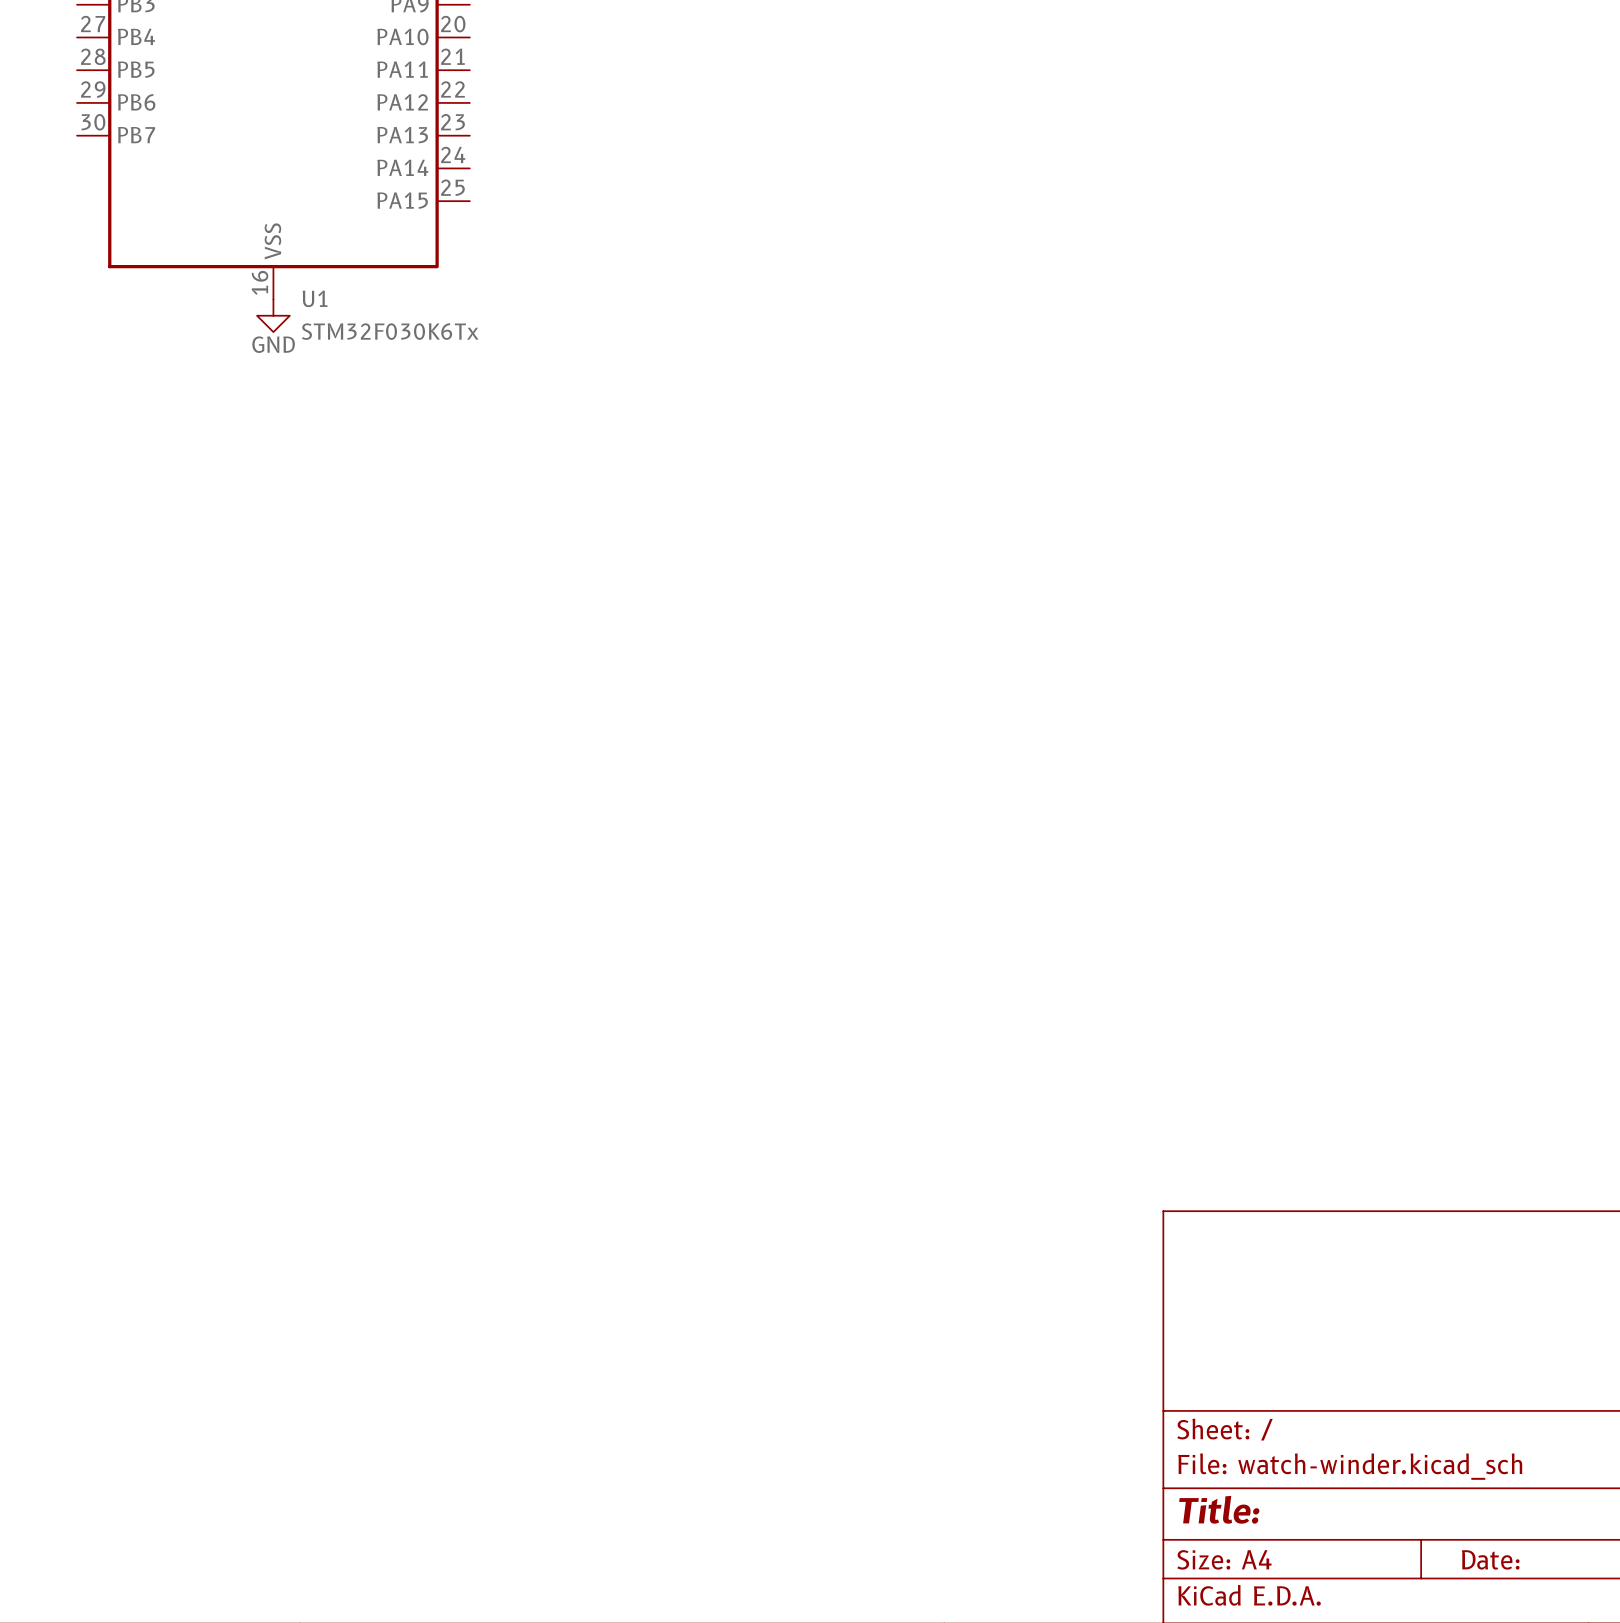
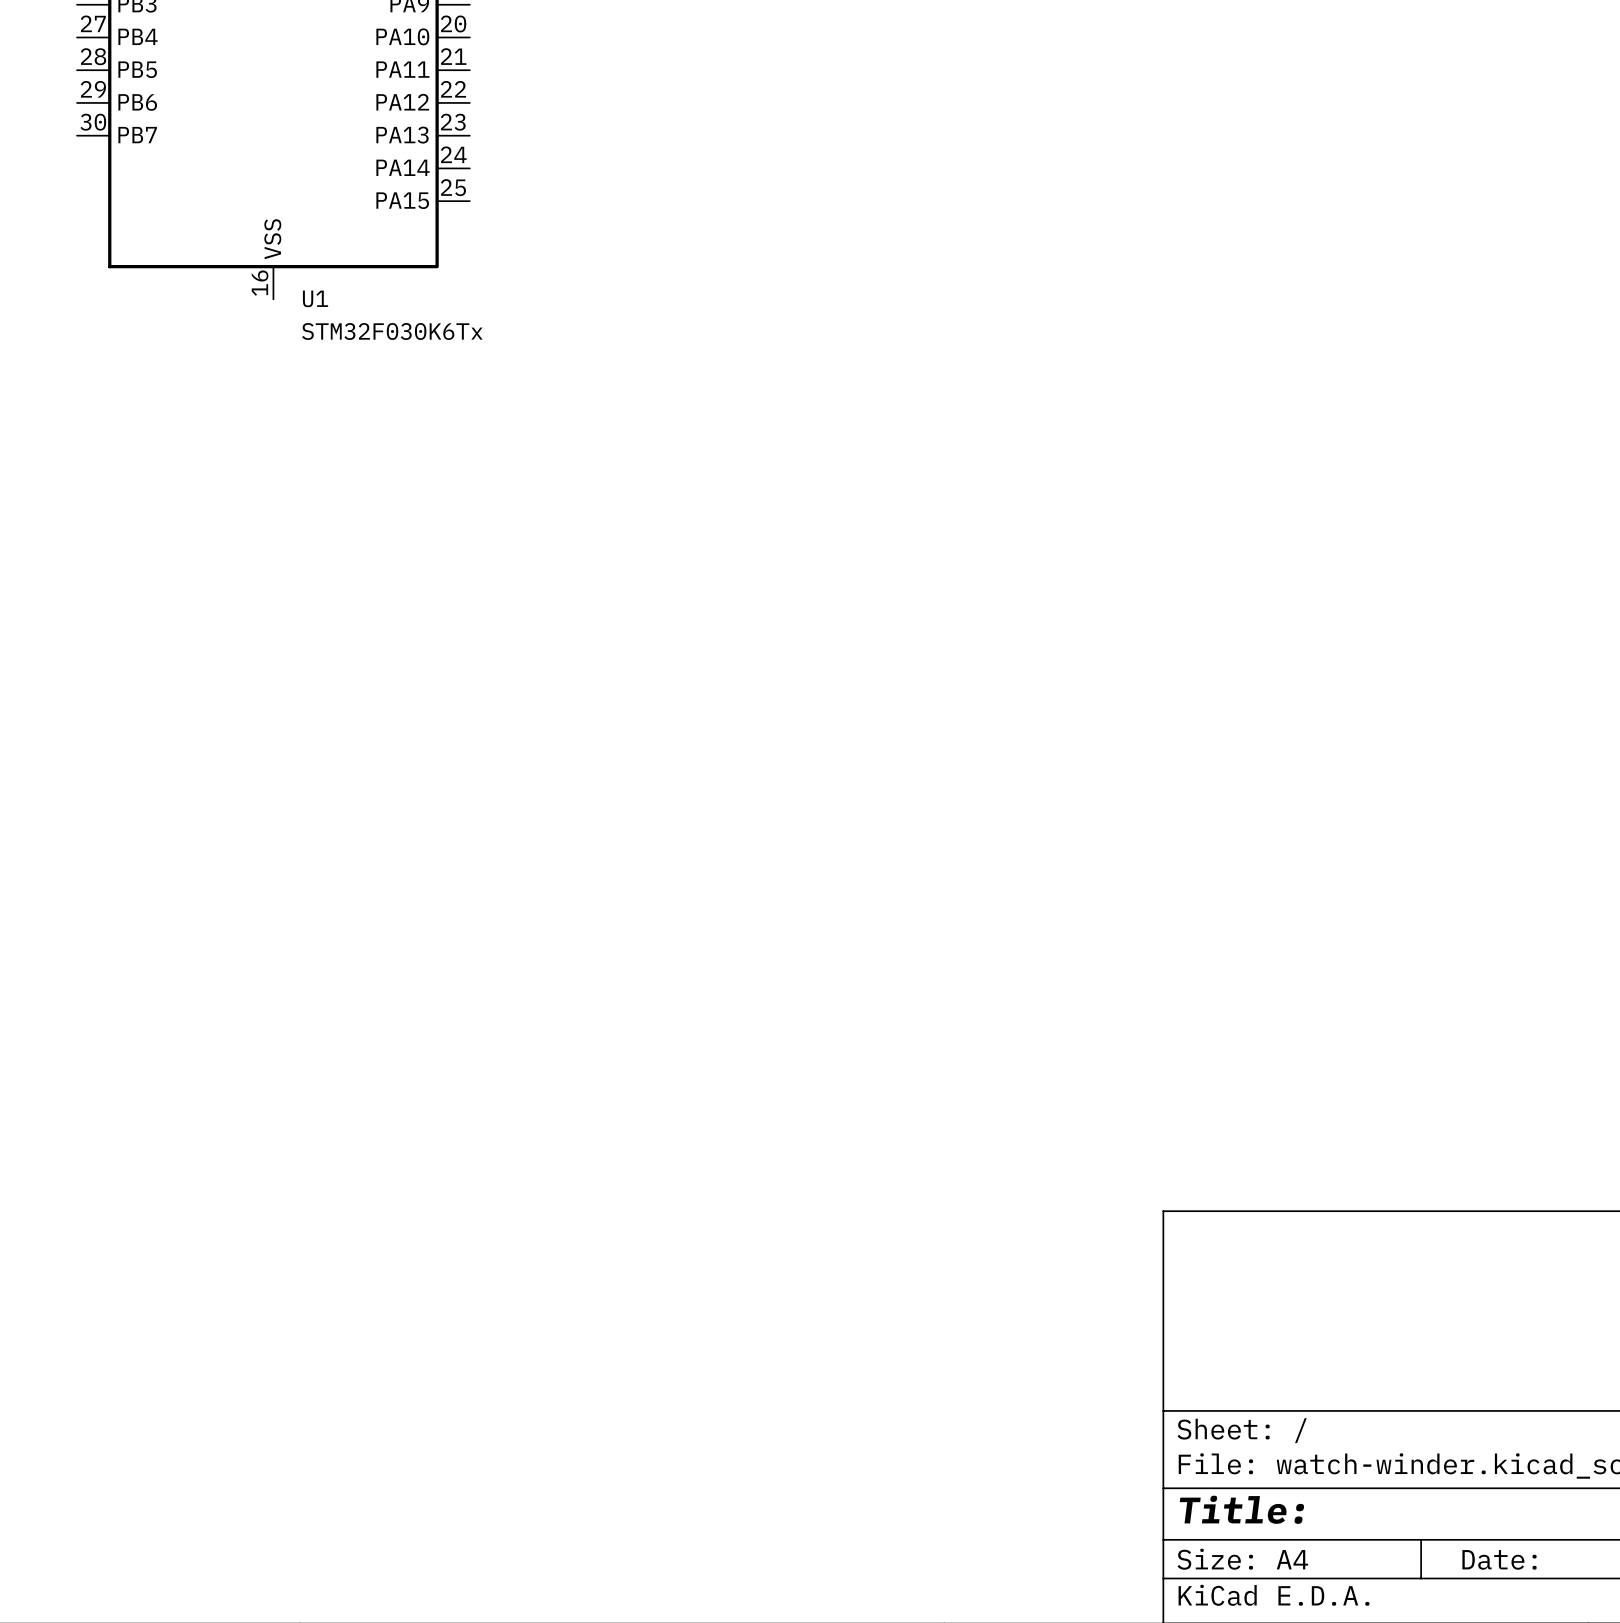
power symbol: GND (273, 315) -> none

